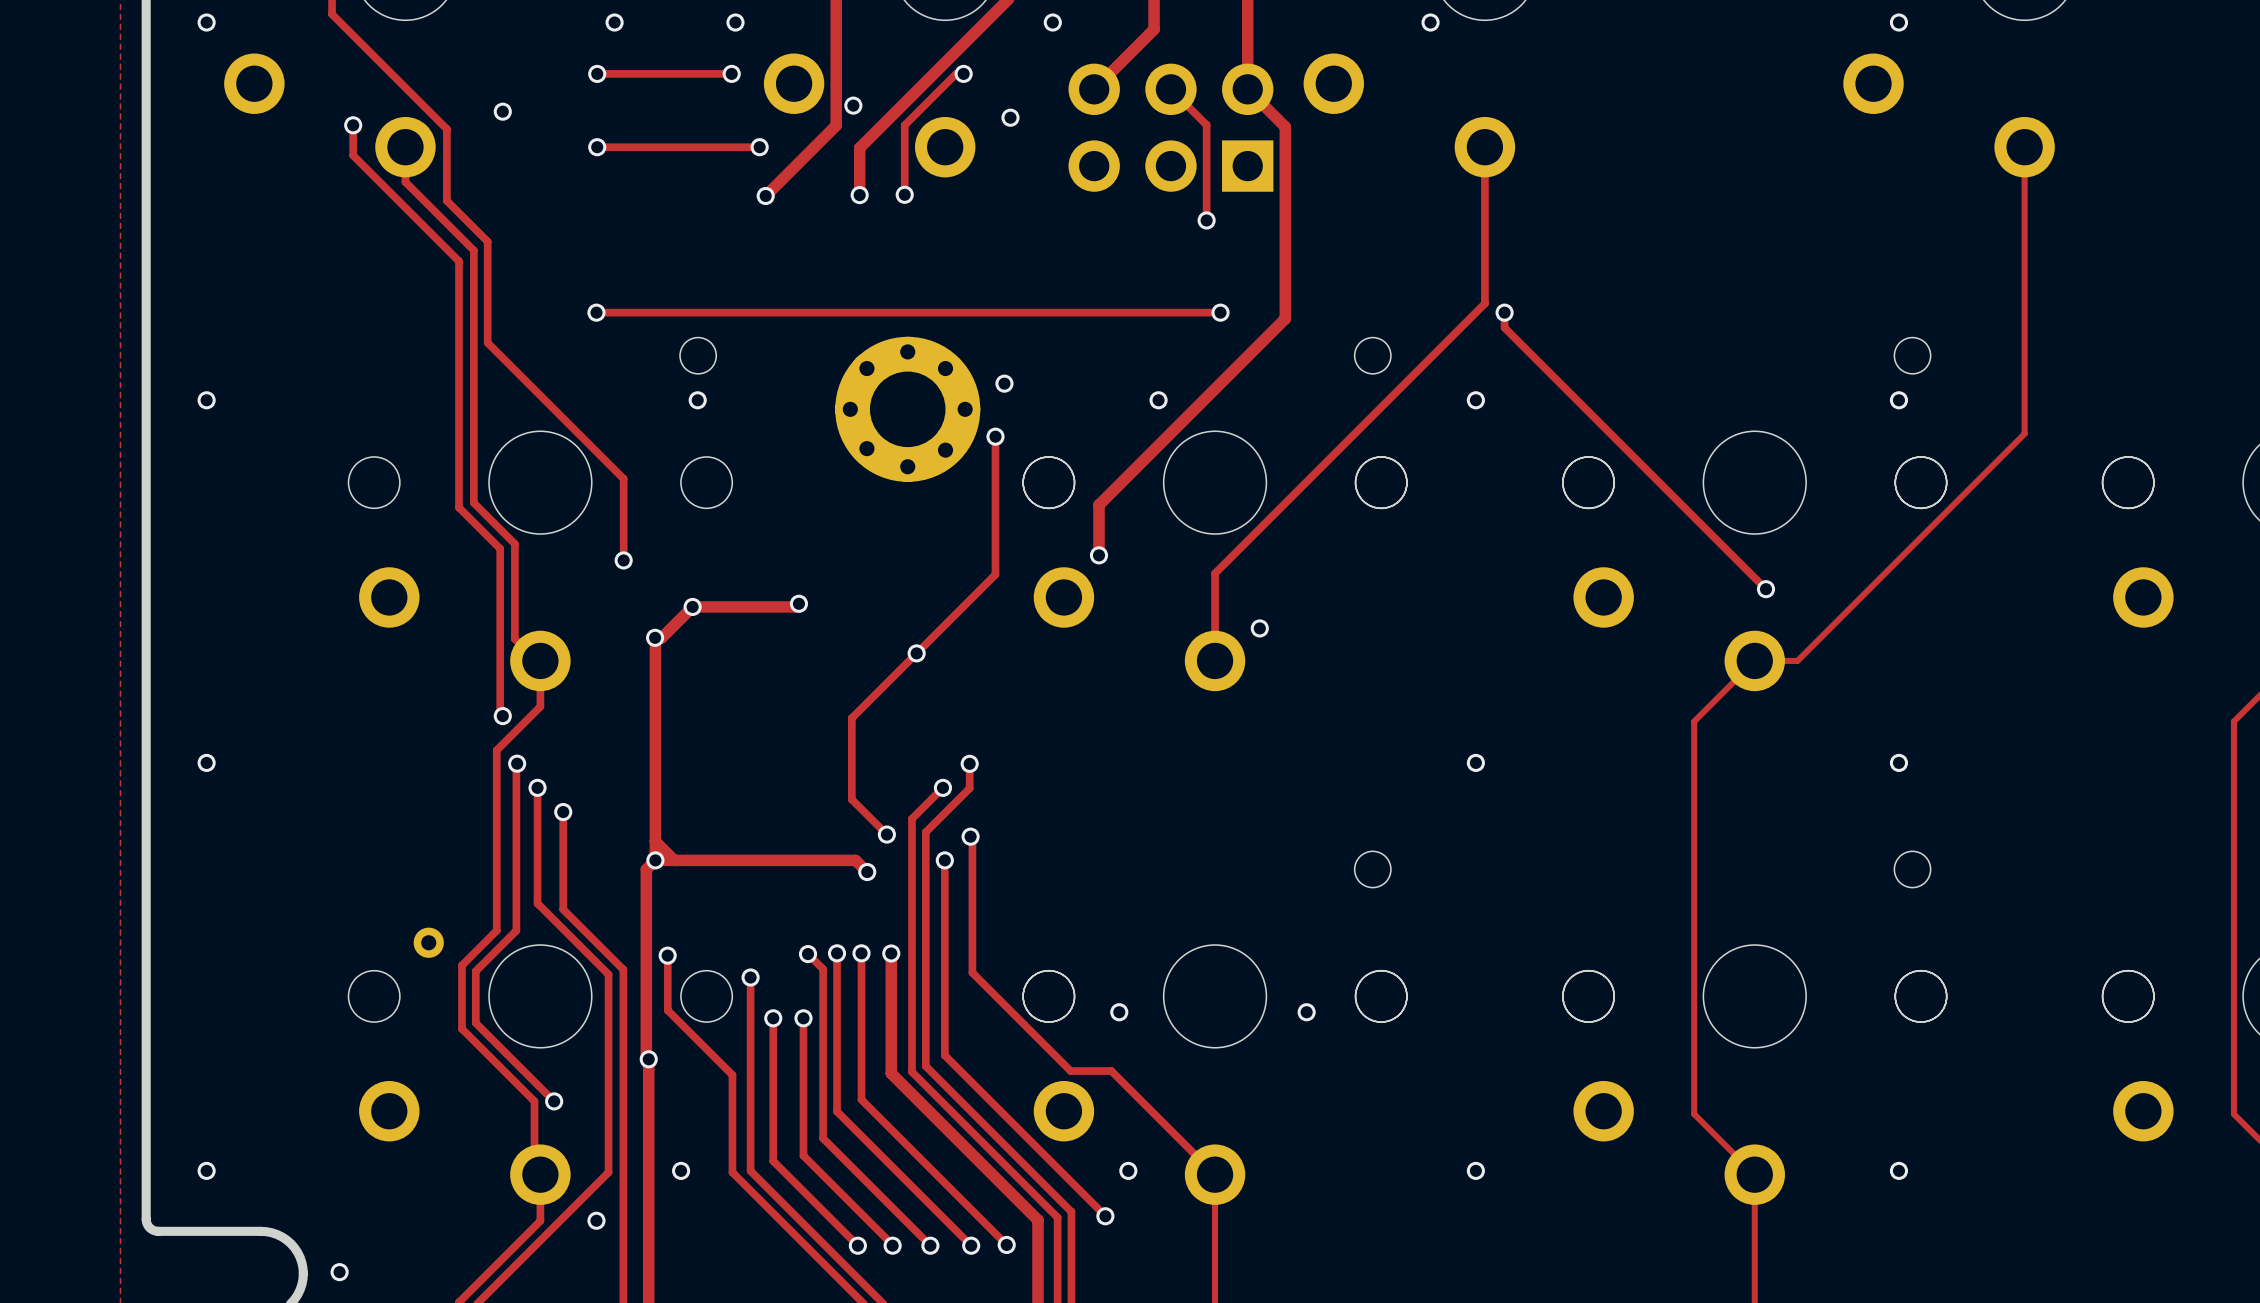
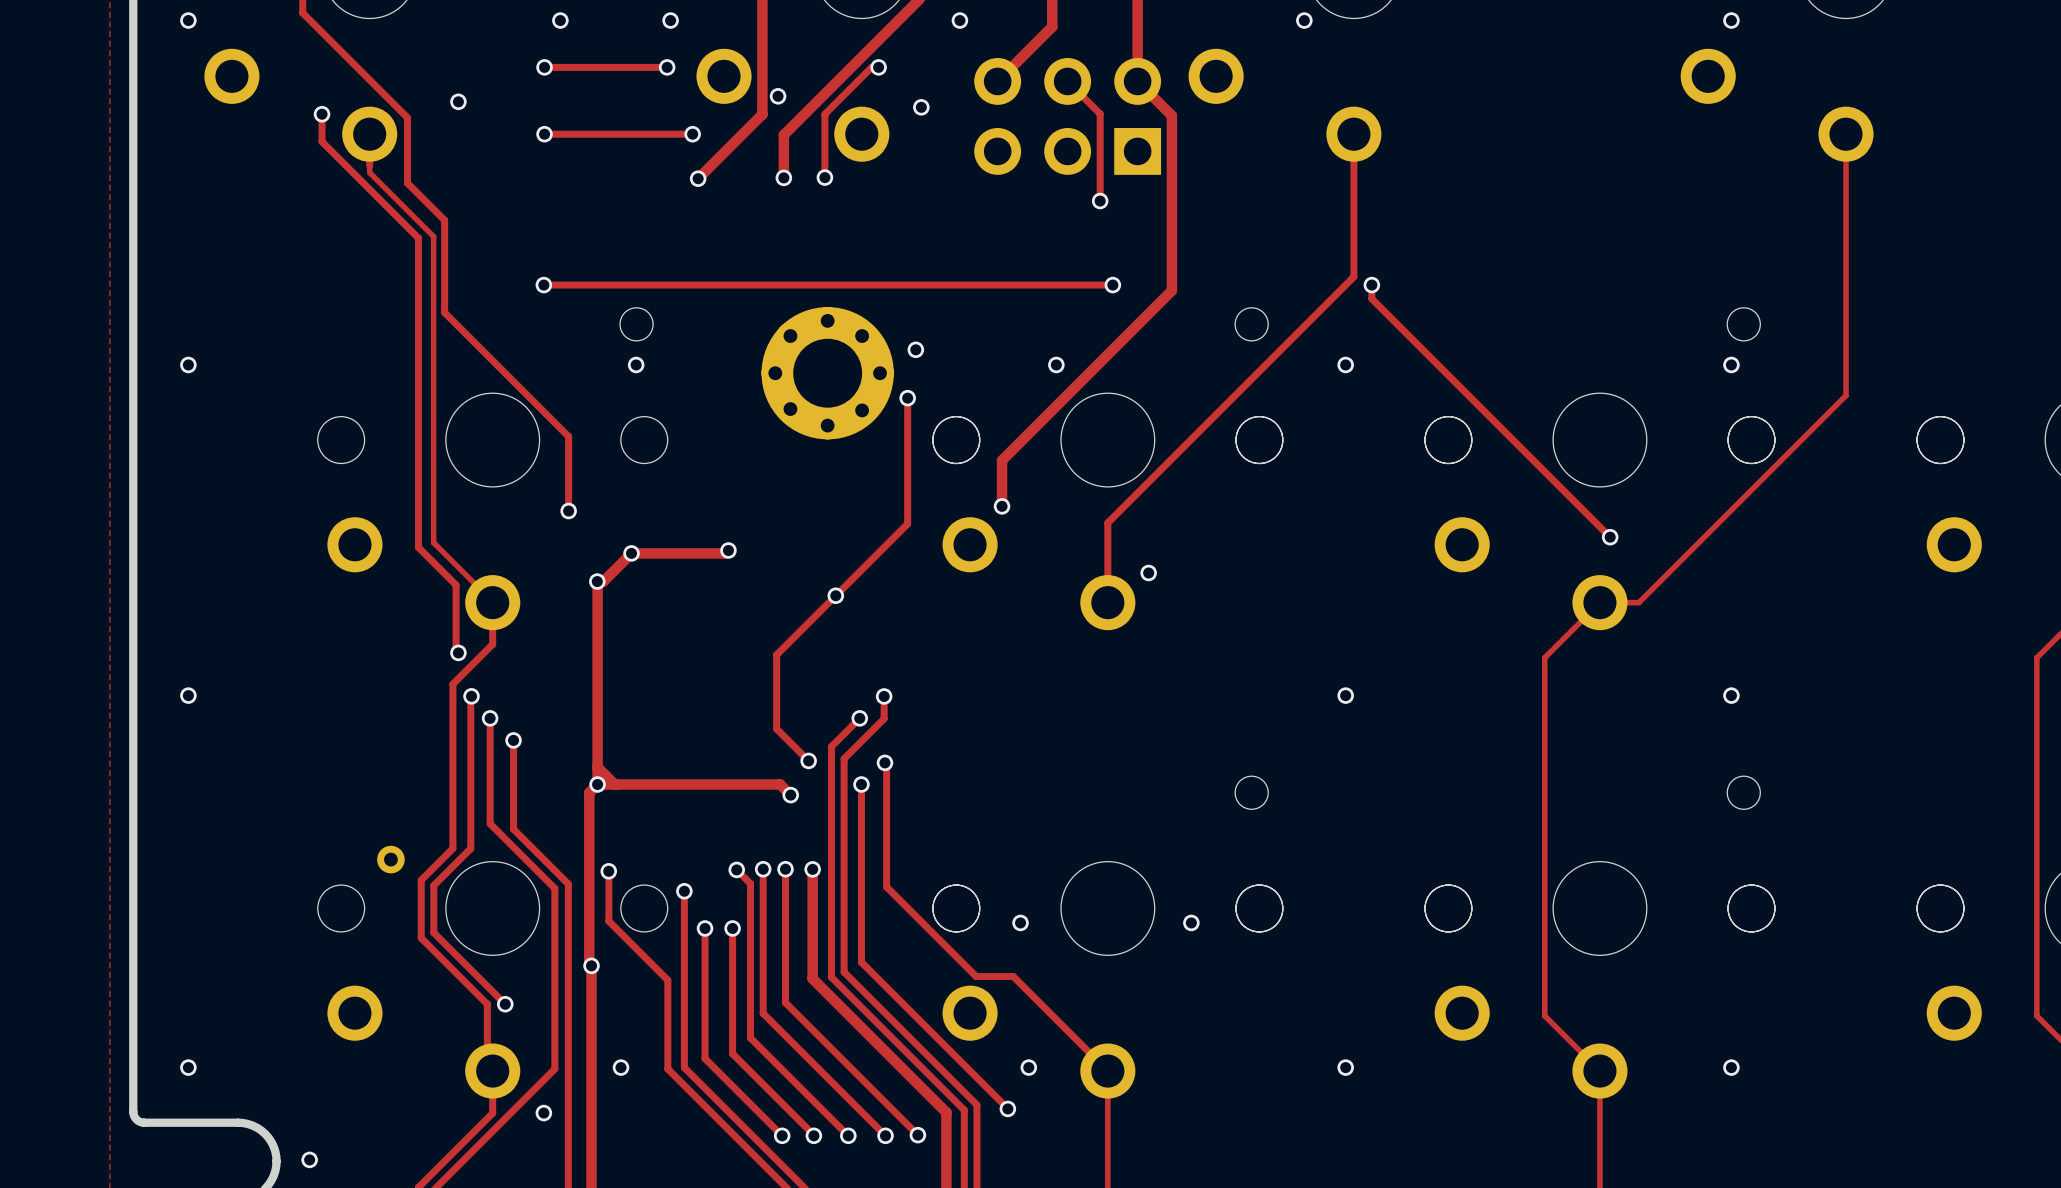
track: (405, 182) (473, 250) (473, 502) (514, 543) (514, 639) (536, 660) (540, 660) -> (369, 166) (369, 172) (433, 236) (433, 542) (492, 602)
track: (458, 507) (500, 548) (500, 641) -> (418, 462) (418, 547) (456, 585)

